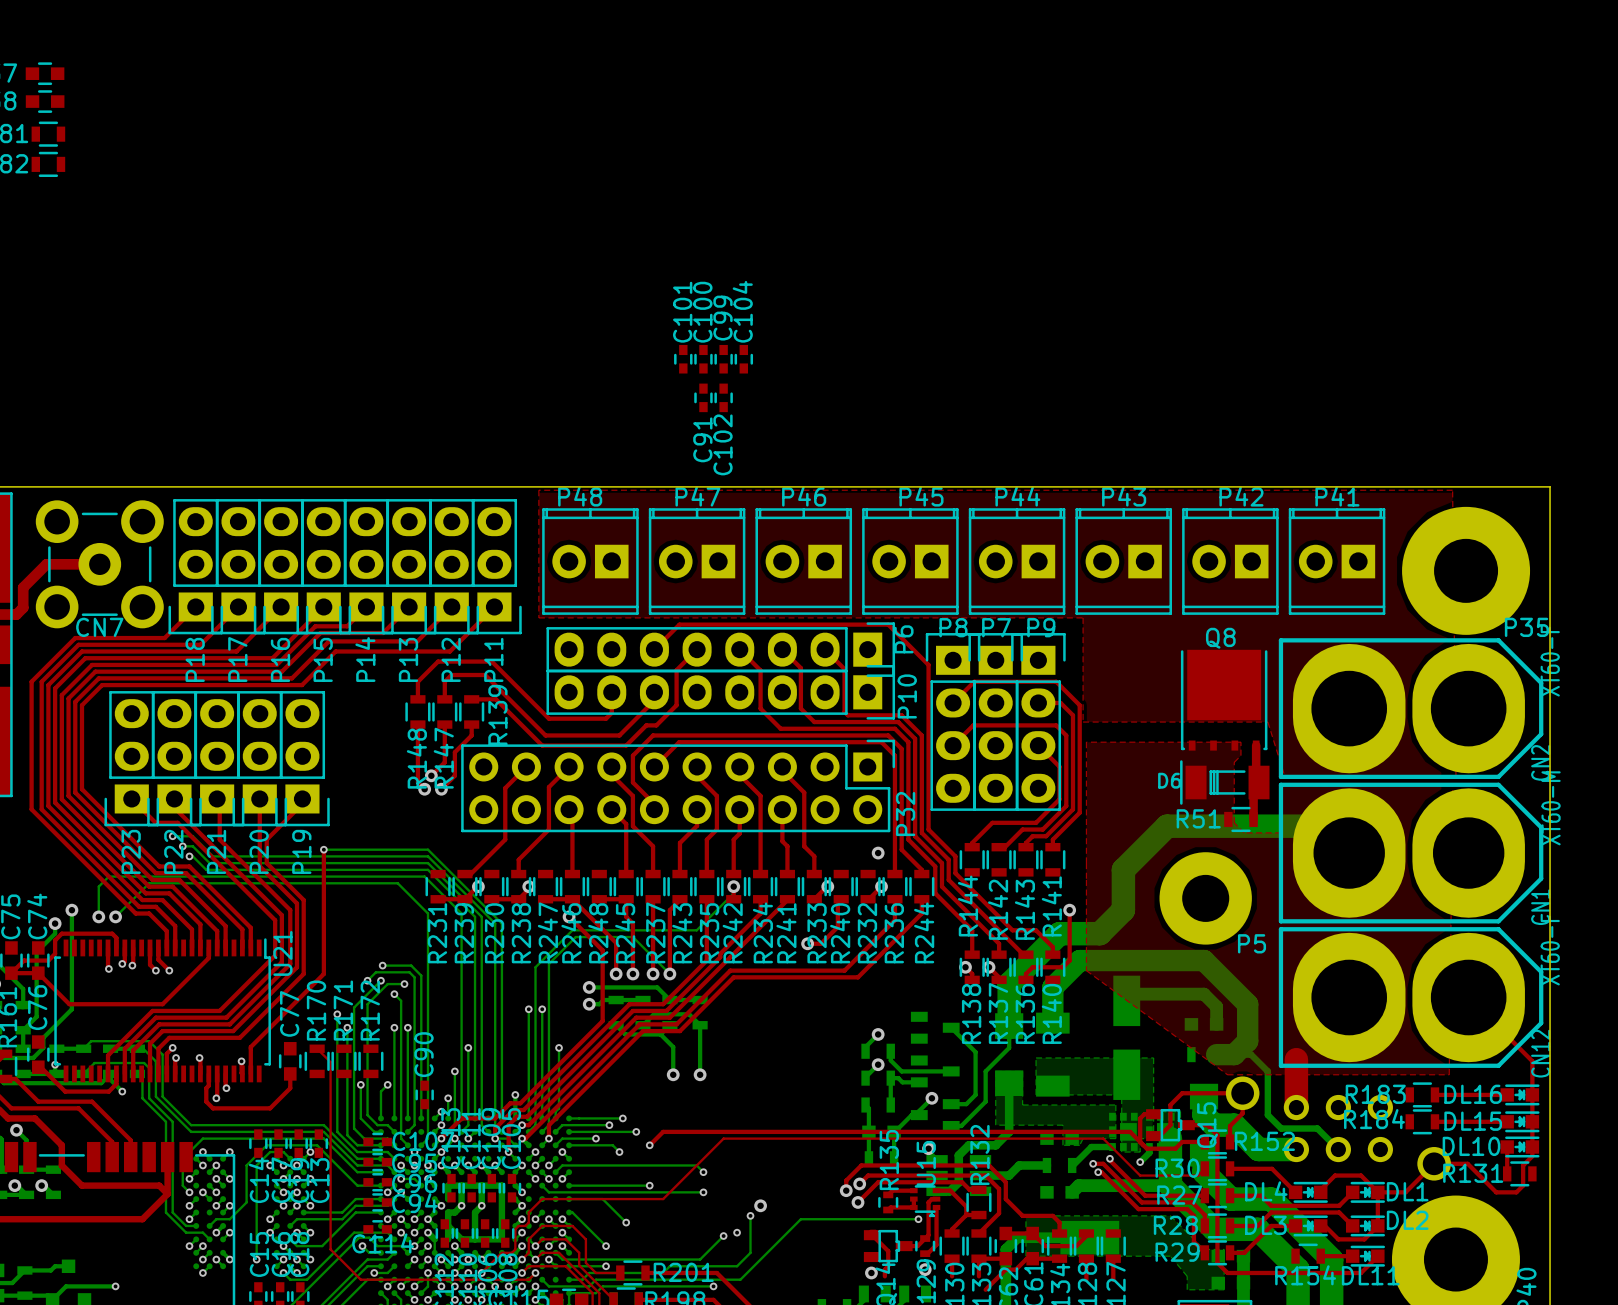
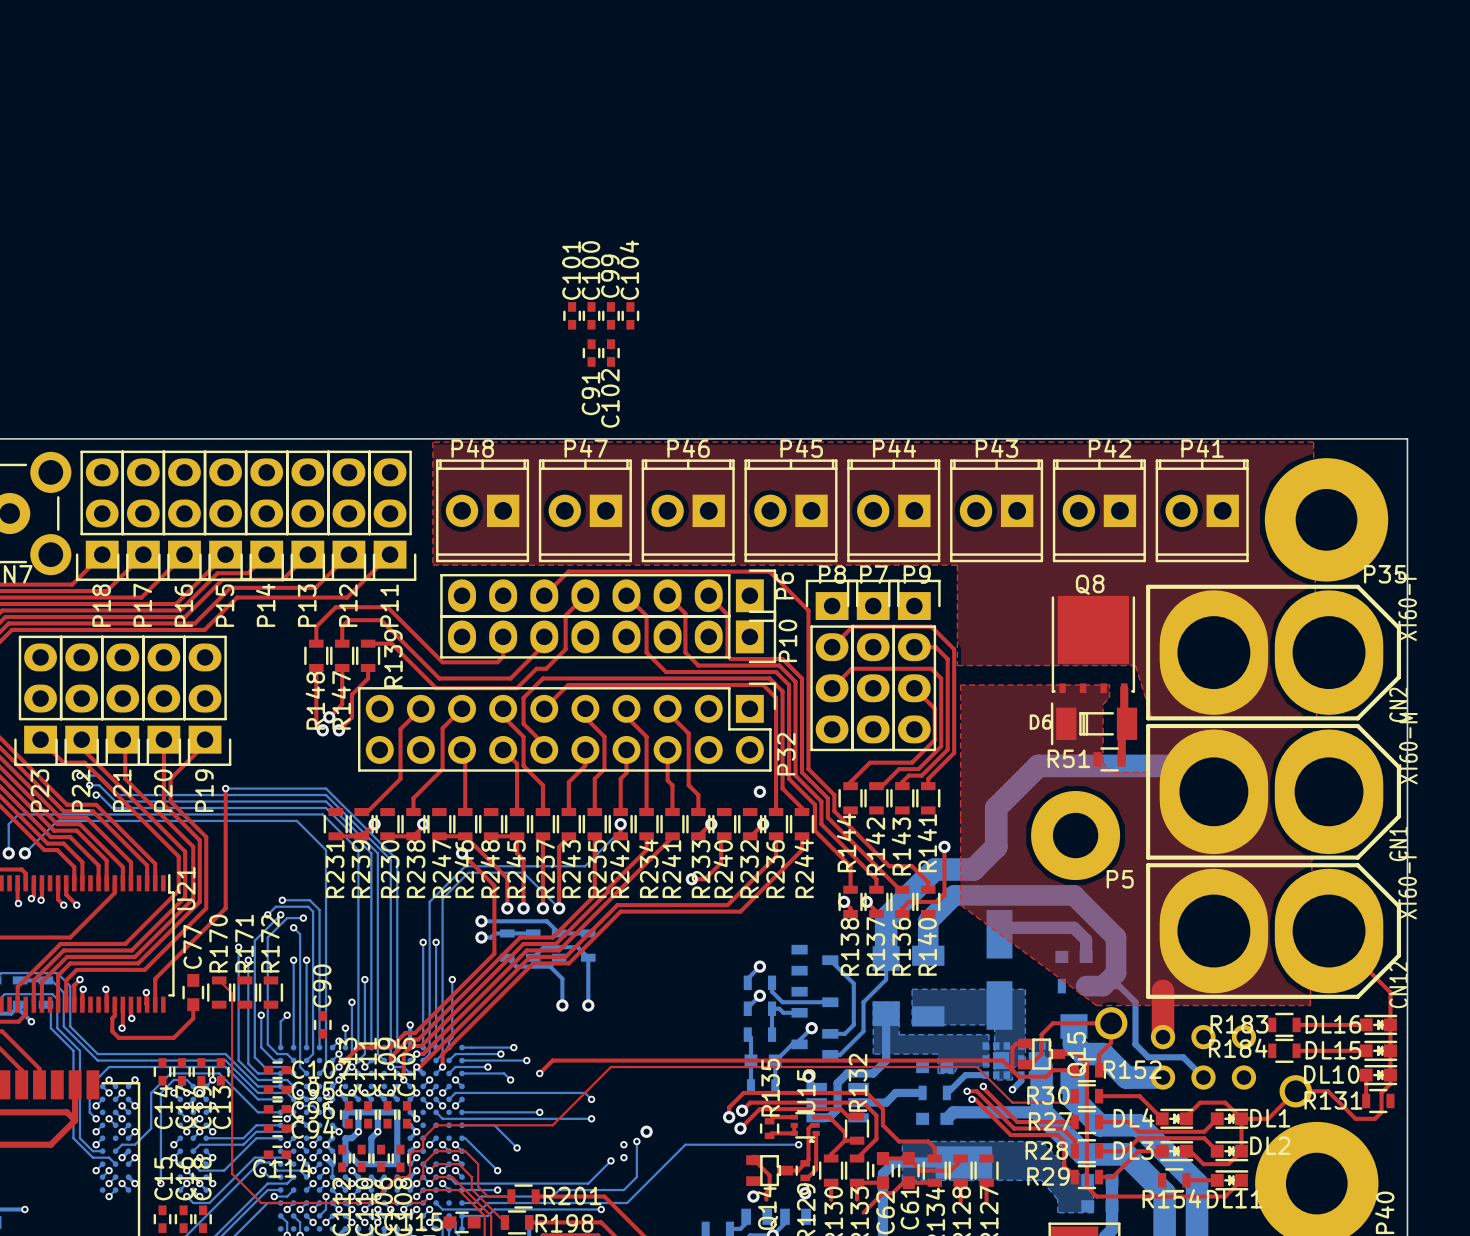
via: none -> (623, 1144)

